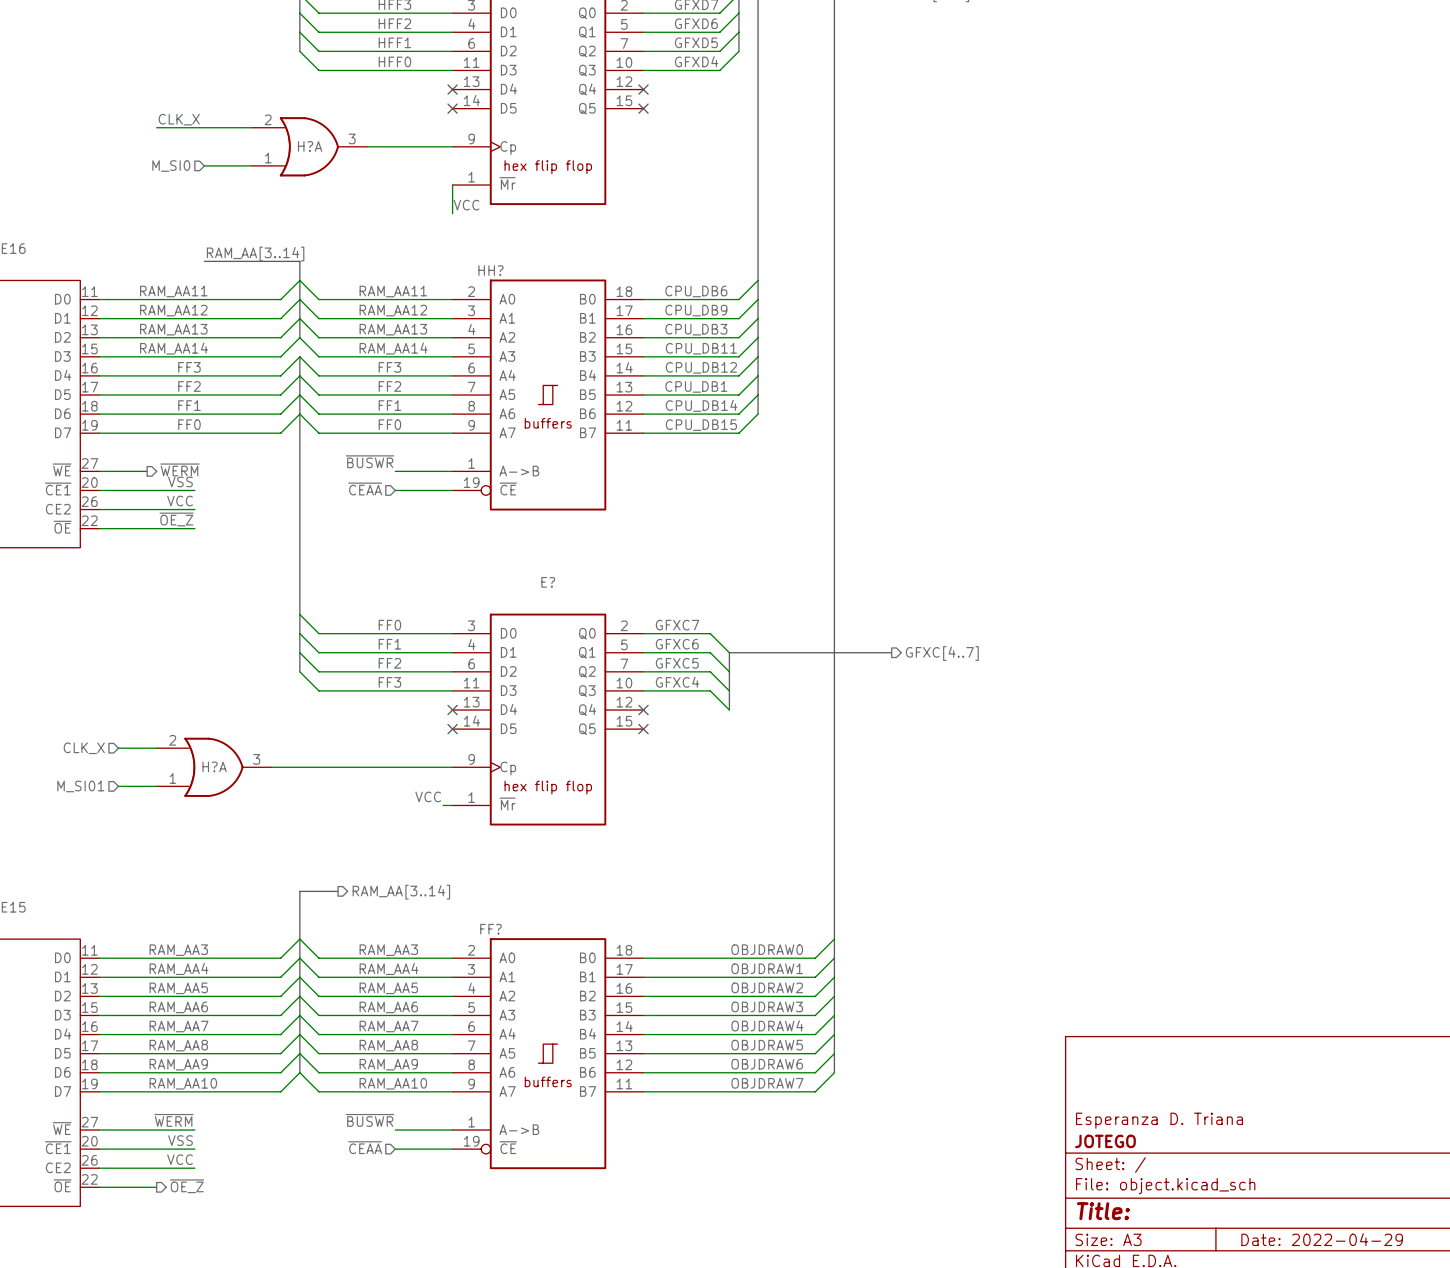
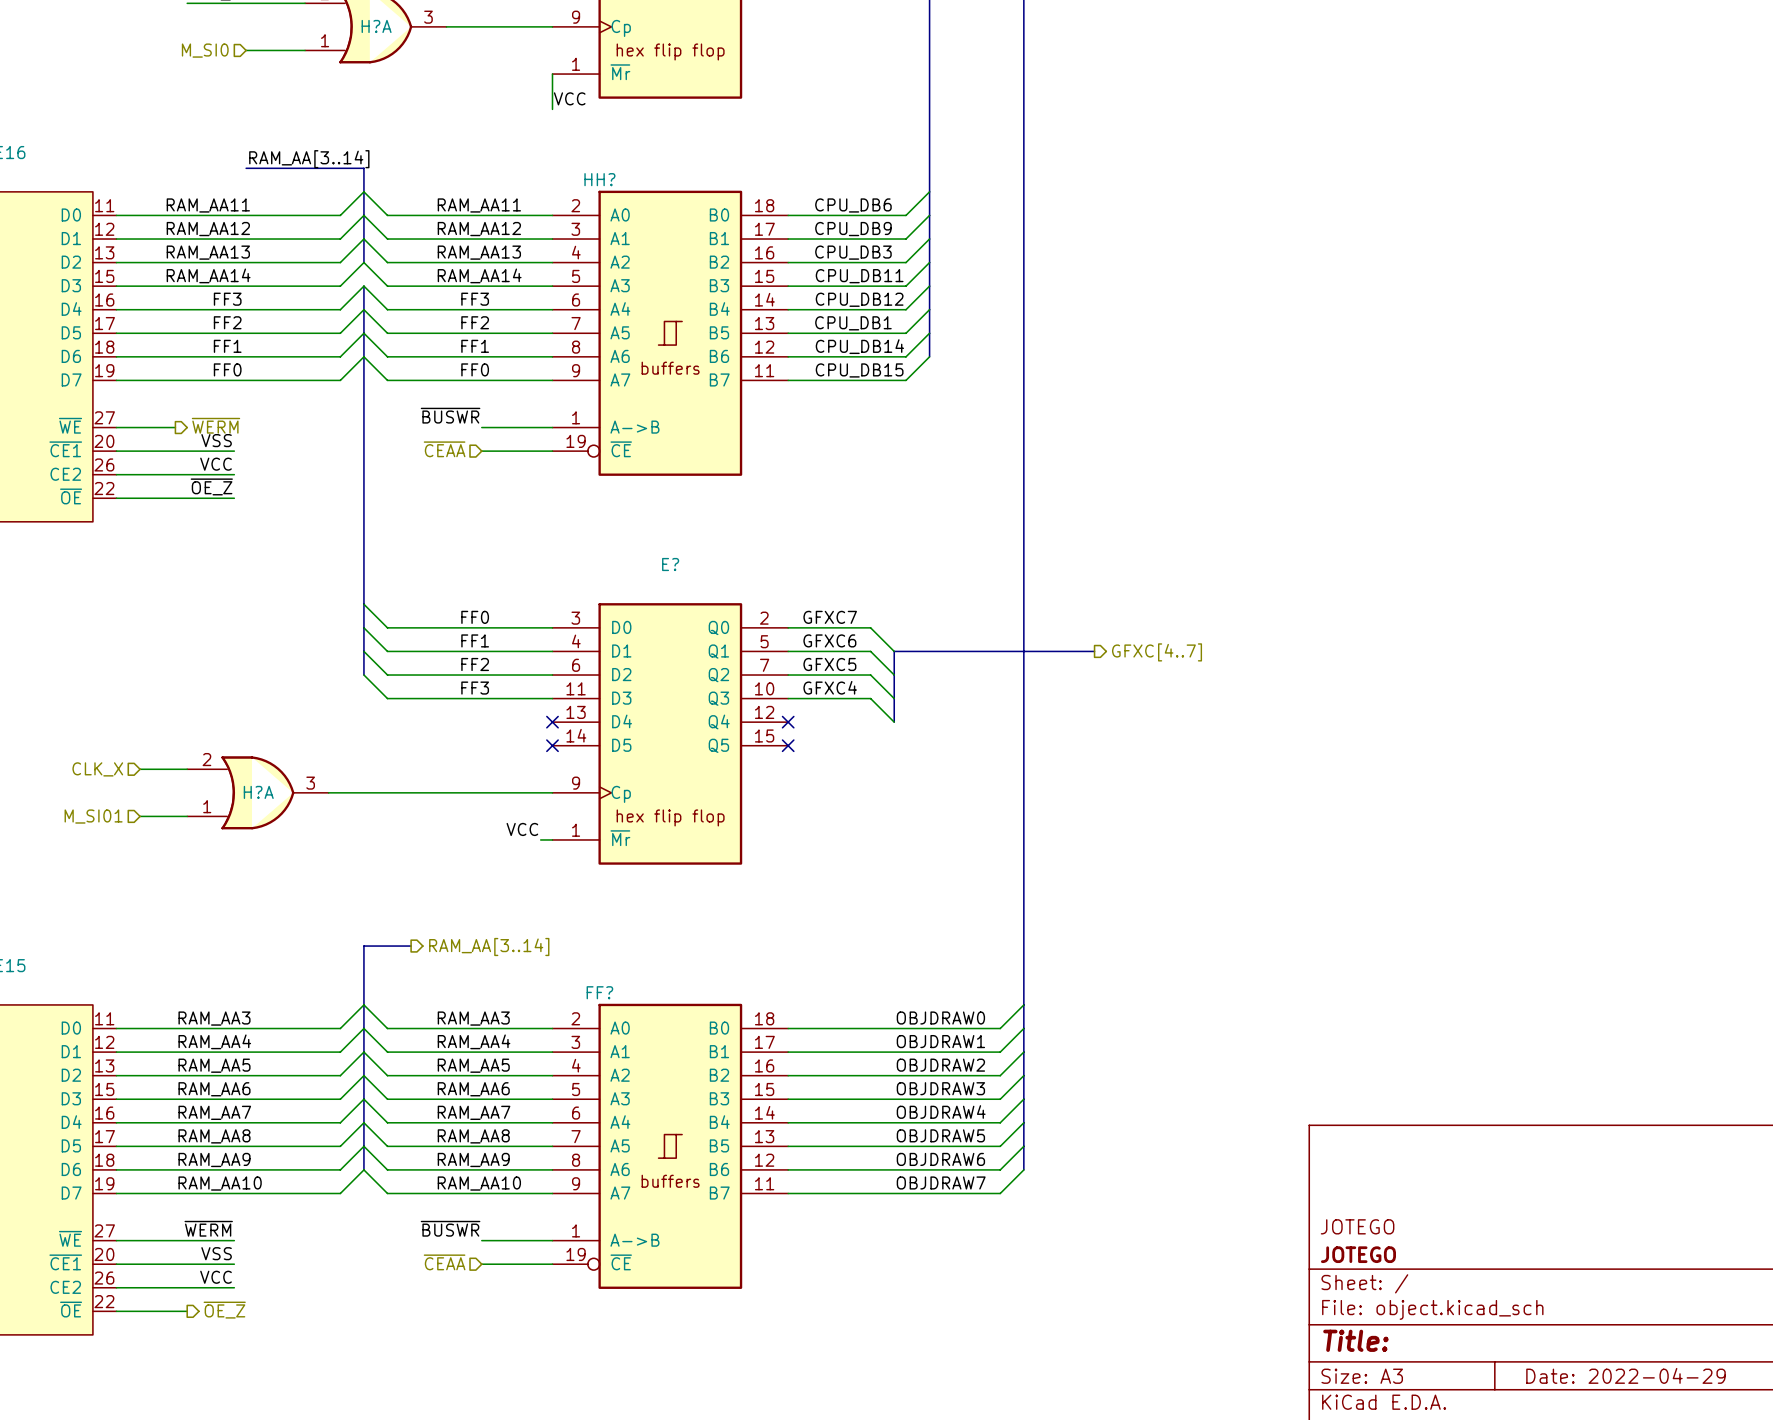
title block: Esperanza D. Triana (1159, 1120) -> JOTEGO (1357, 1226)

